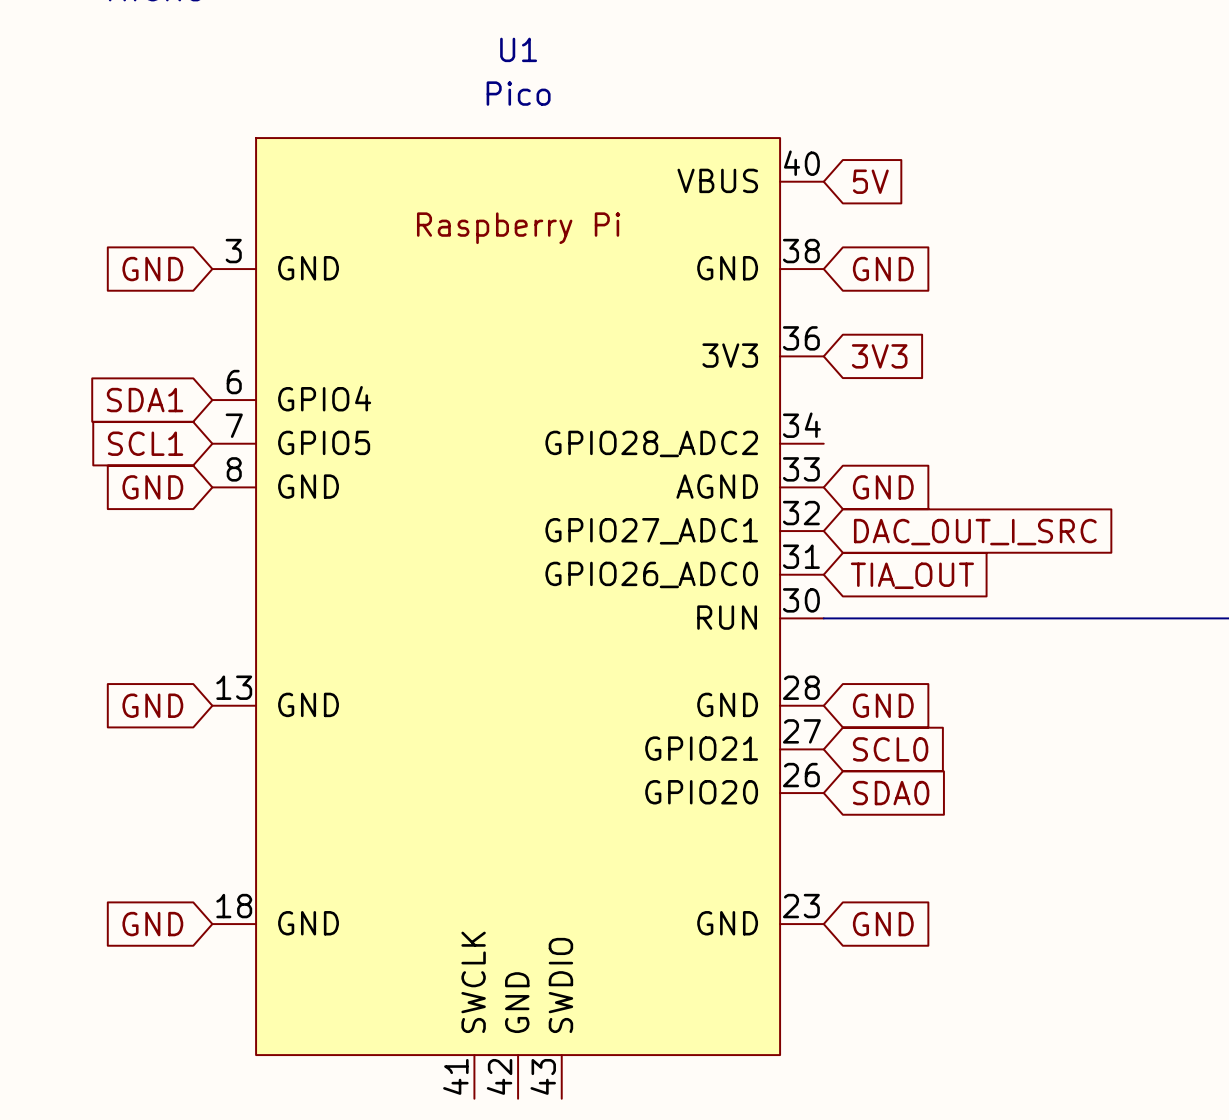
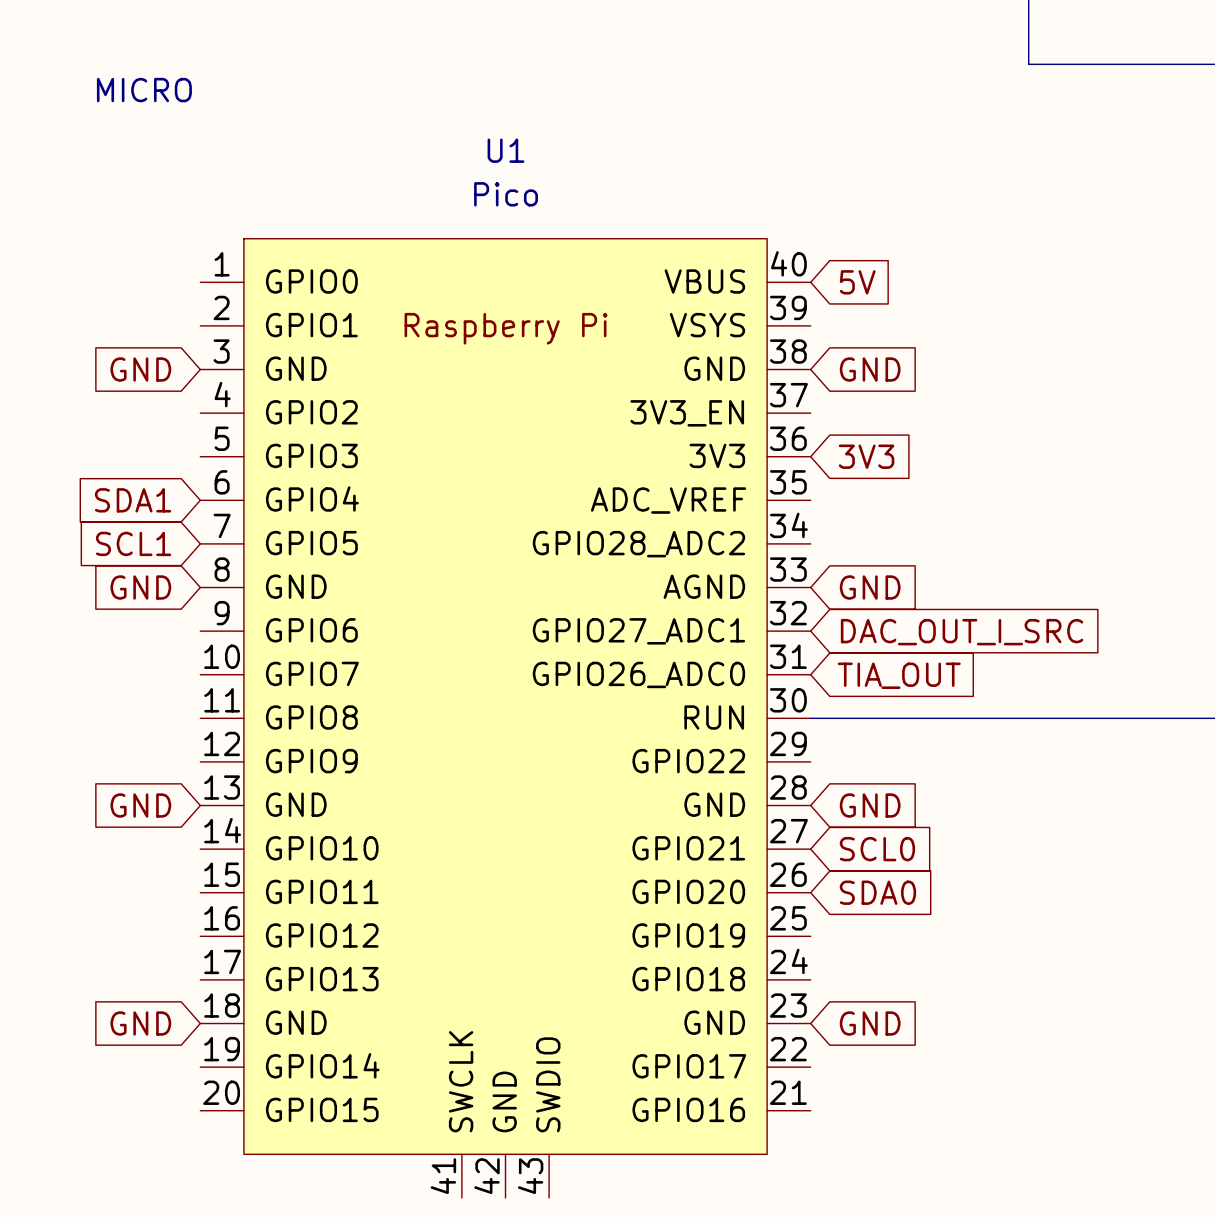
U1 symbol: [212, 138, 824, 1099] -> [200, 238, 811, 1198]

